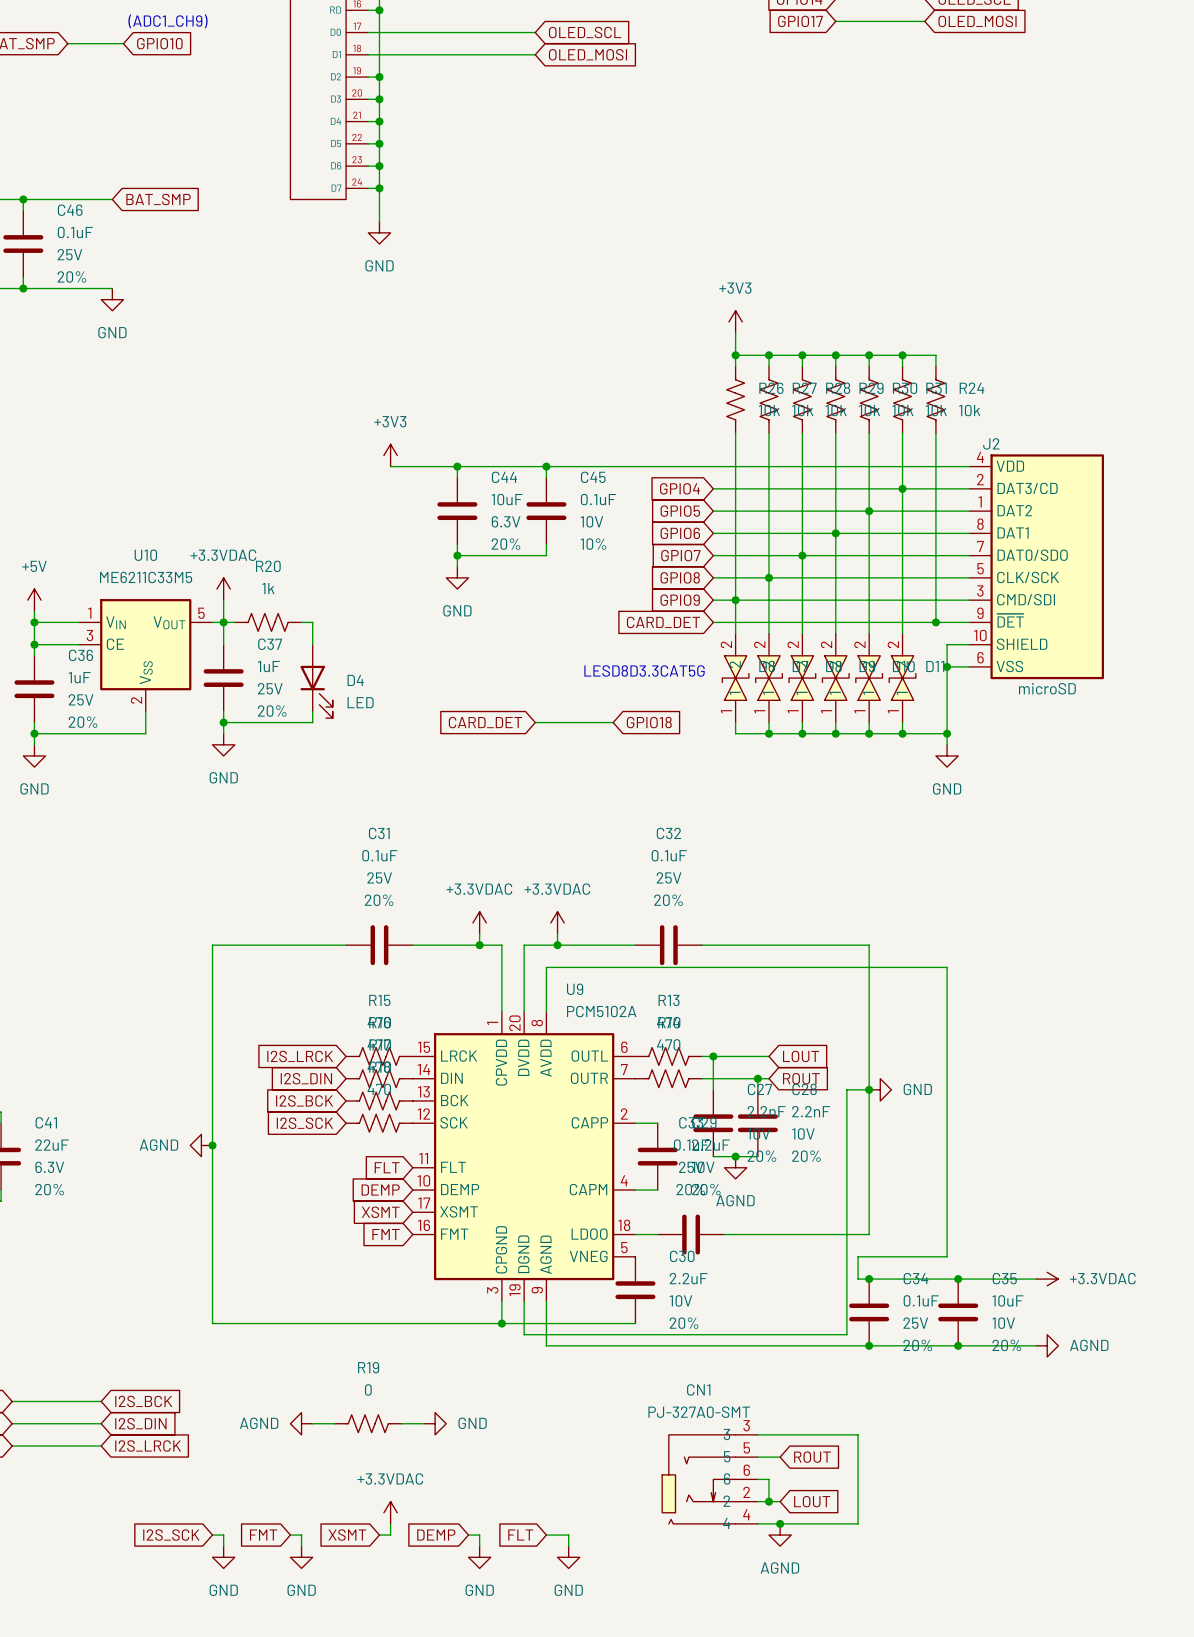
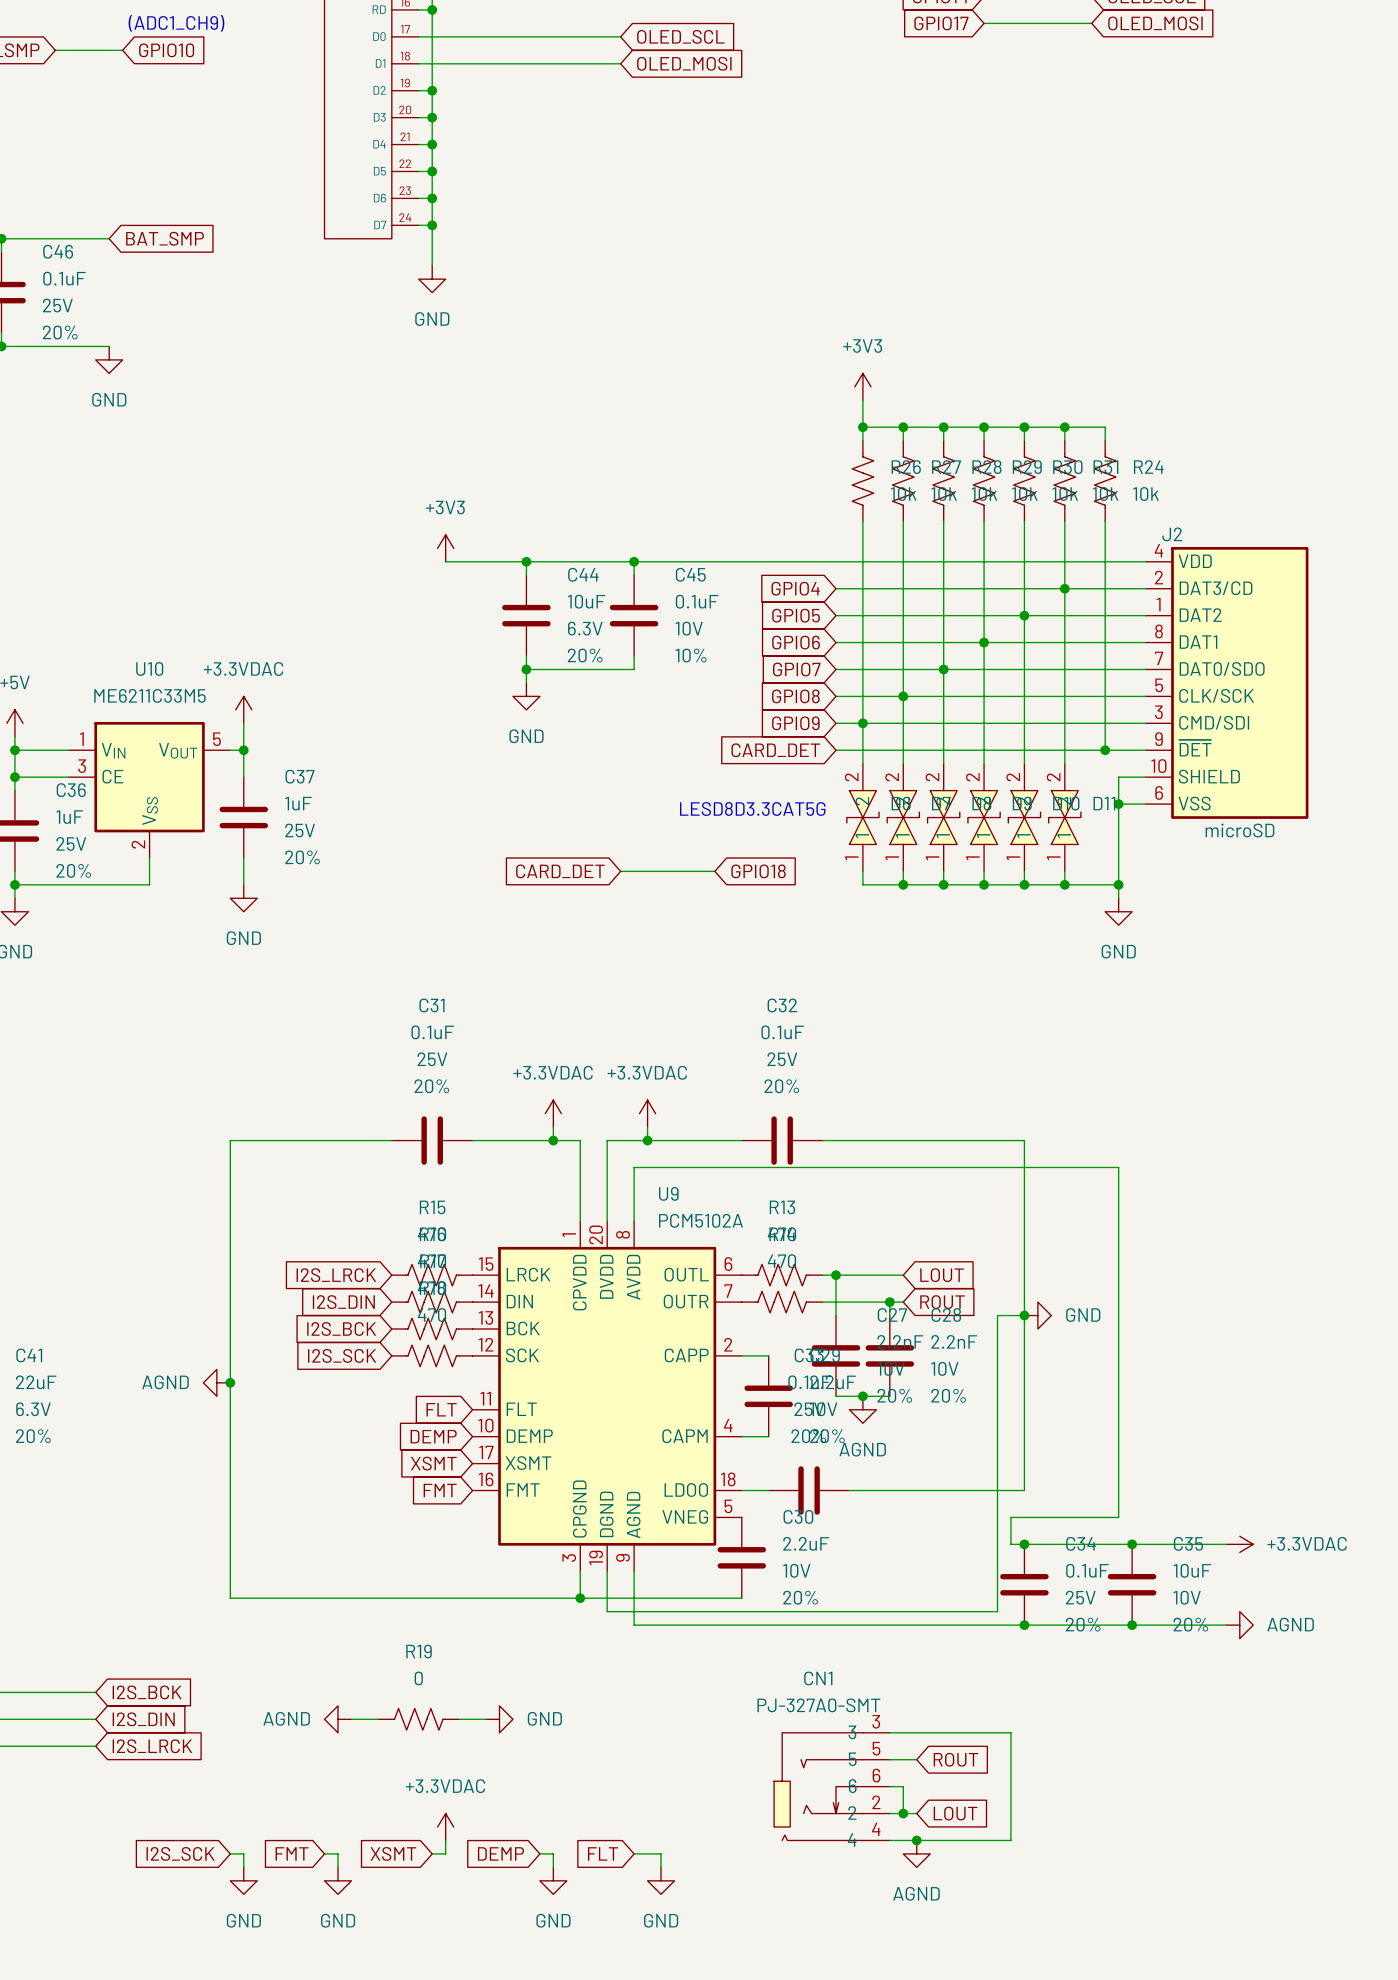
wire: (223, 622) (234, 622) -> none
R20: 1k (268, 622) -> none
wire: (301, 622) (312, 622) (312, 644) -> none
D4: LED (316, 681) -> none
wire: (312, 711) (312, 722) (223, 722) -> none
junction: (223, 722) -> none

